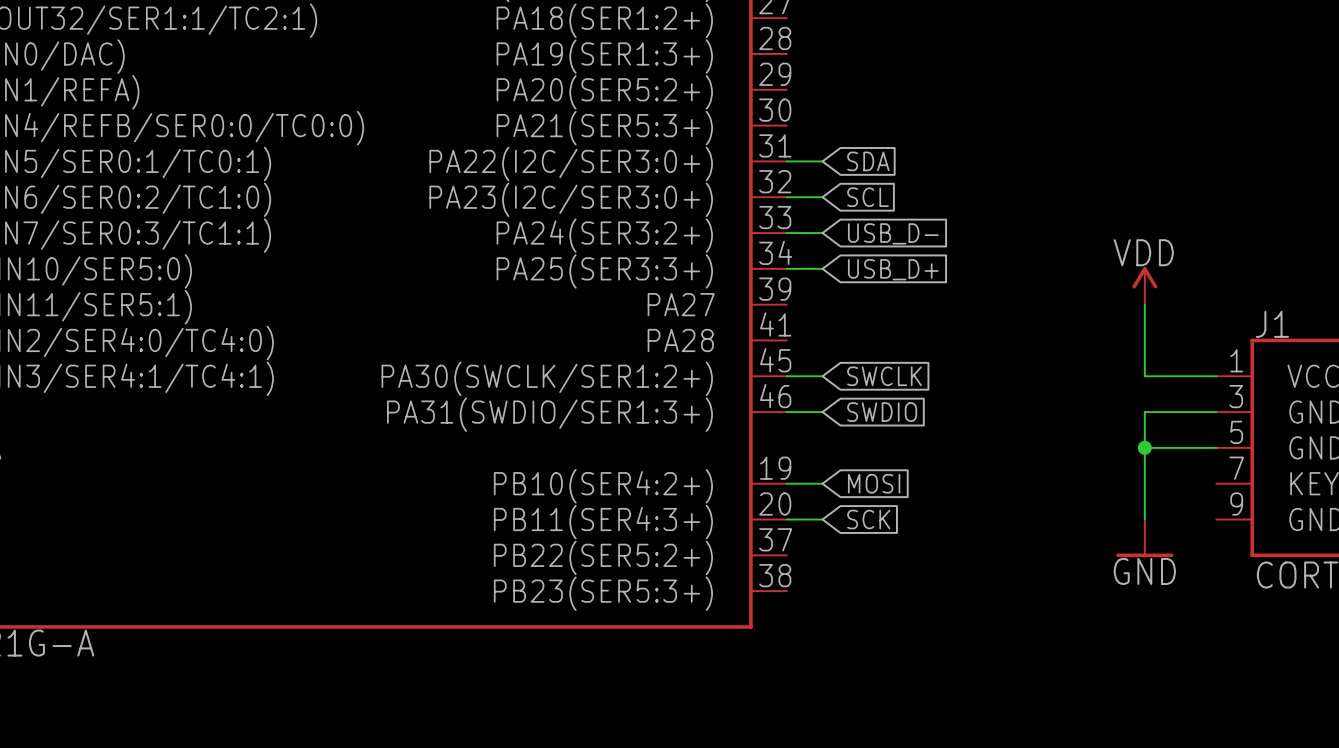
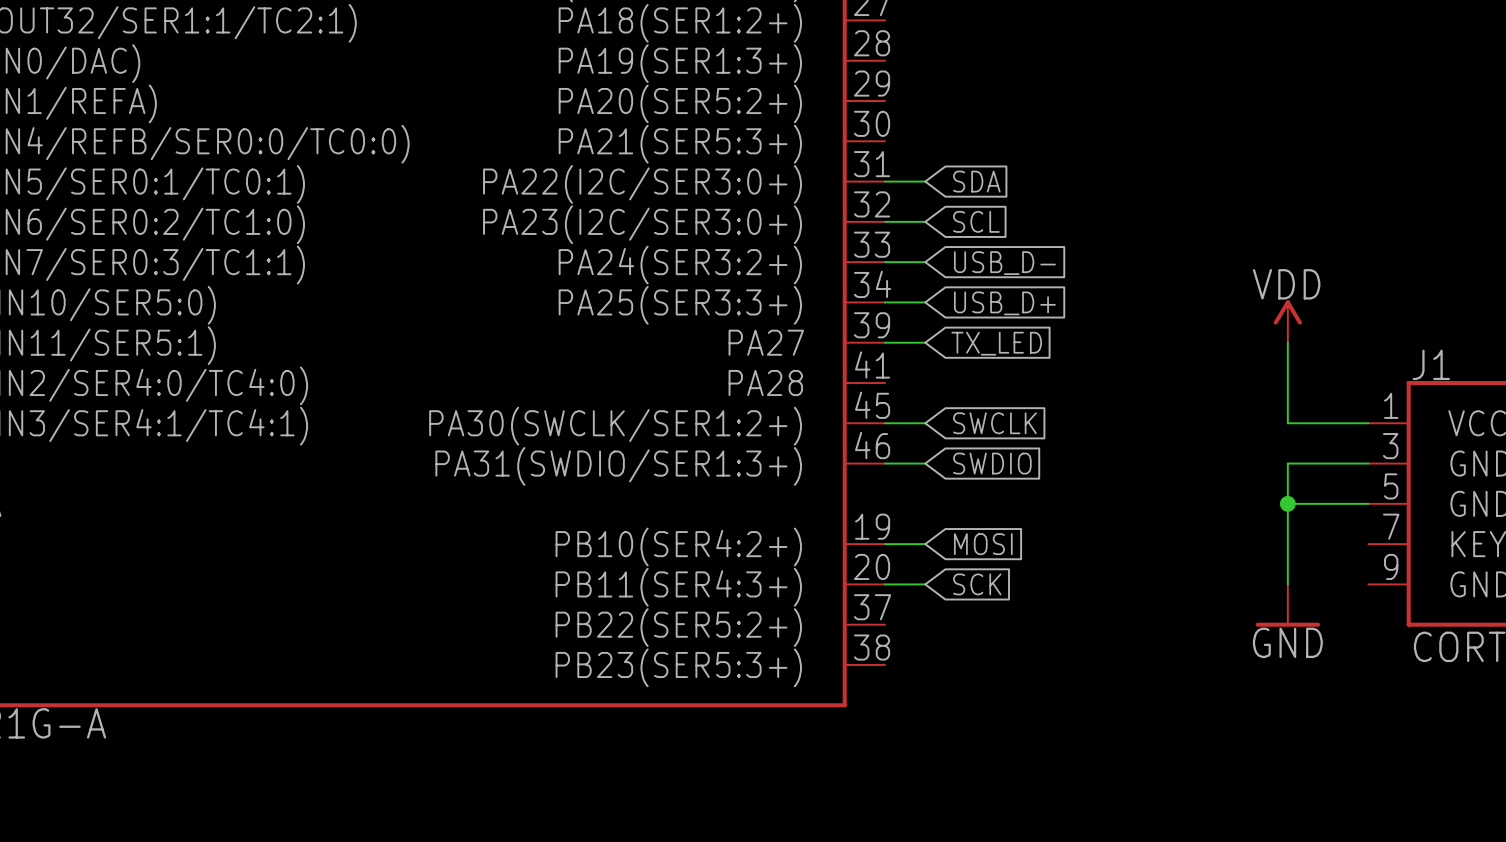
wire: none -> (885, 342) (925, 342)
global label: none -> TX_LED (996, 343)

